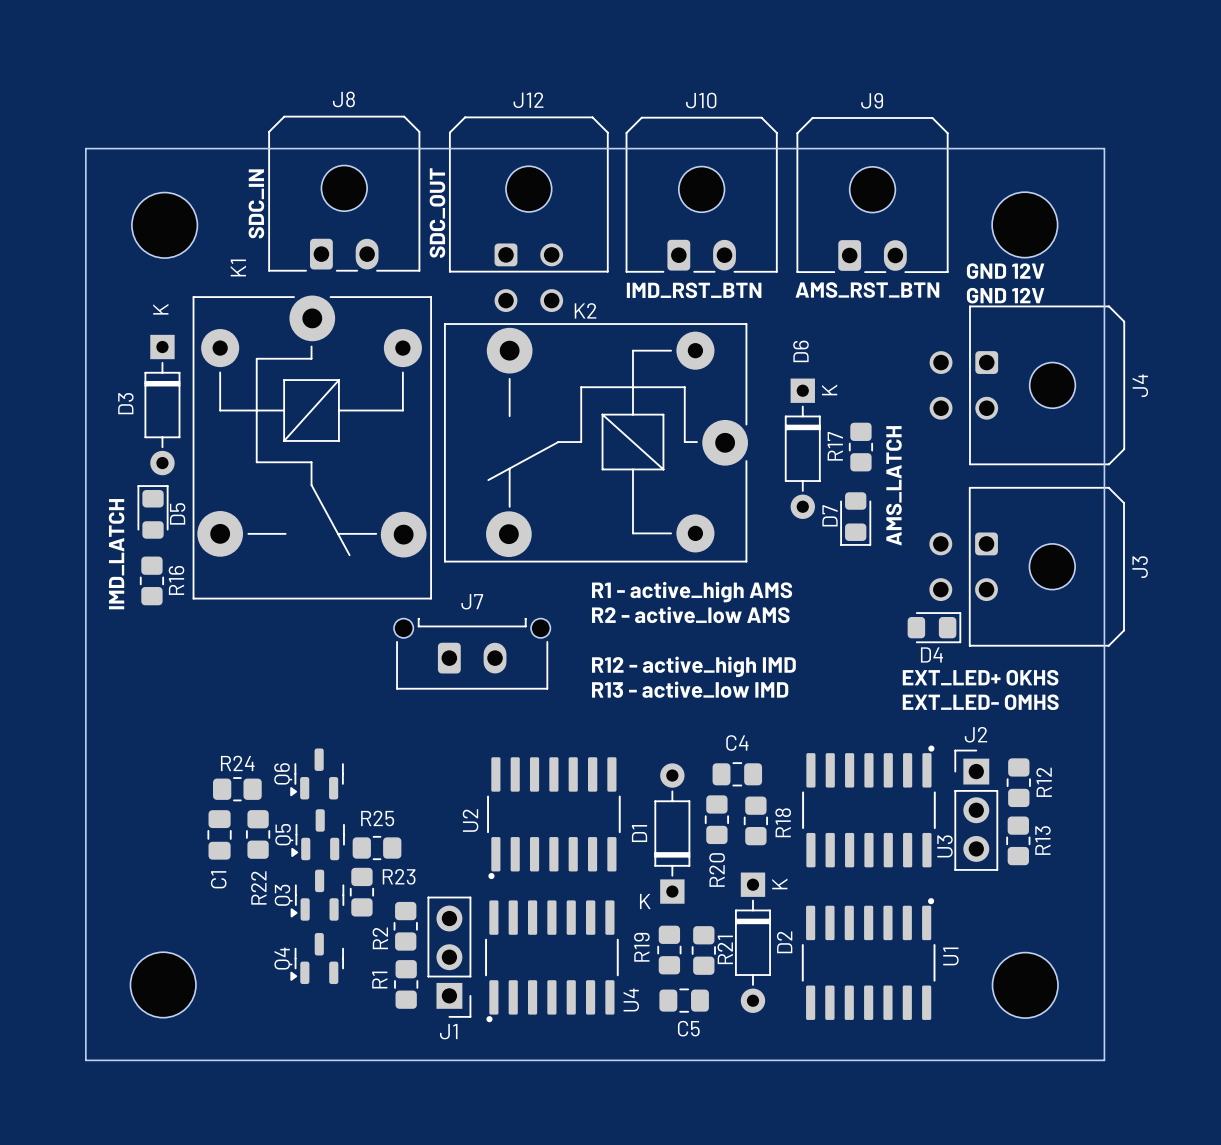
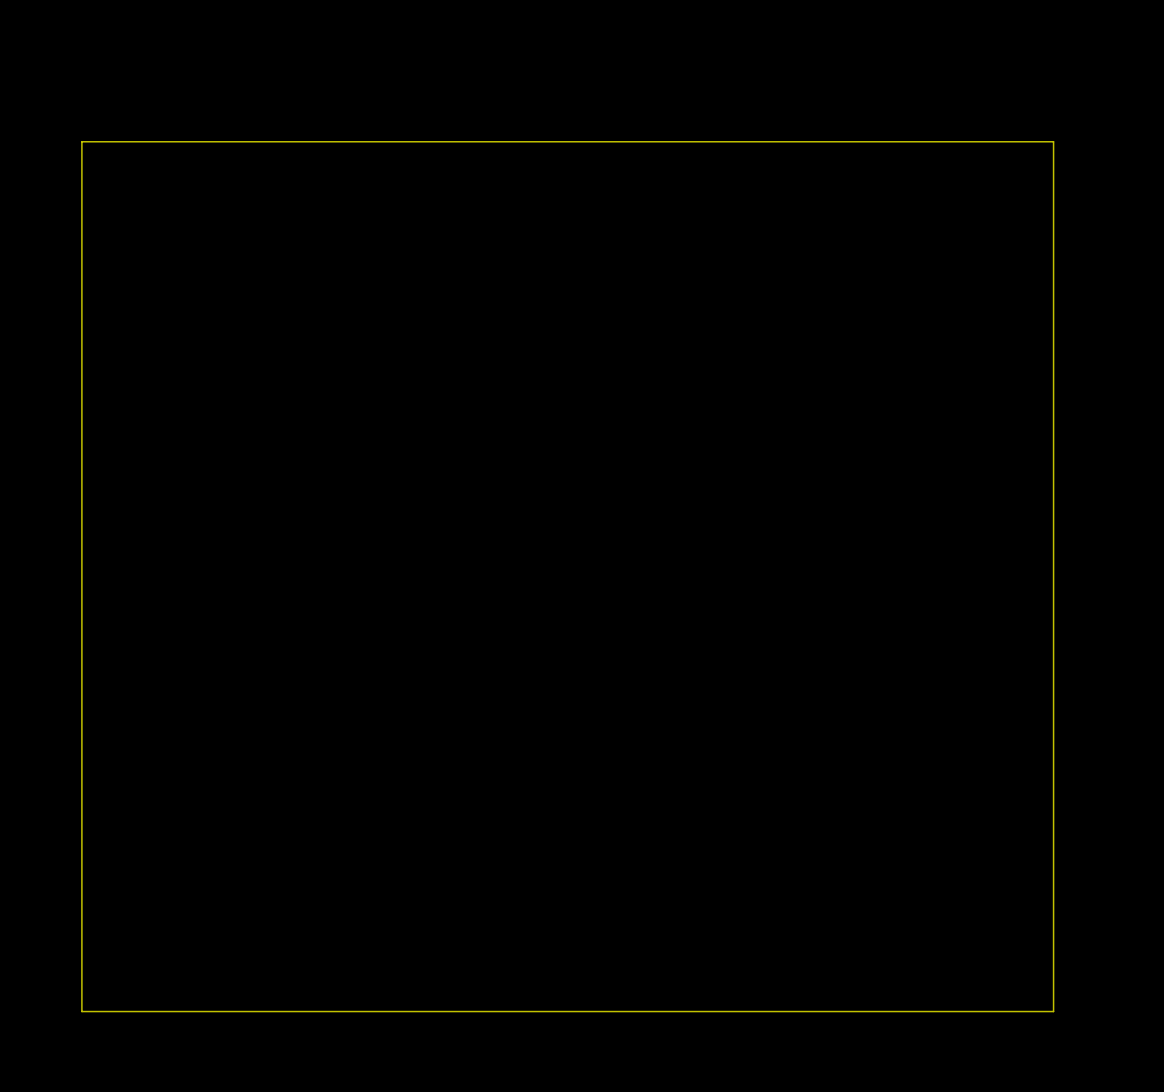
J8: (344, 193) -> none
J10: (701, 194) -> none
J9: (872, 195) -> none
text: SDC_IN (256, 203) -> none
text: SDC_OUT (437, 213) -> none
J12: (528, 214) -> none
part: (1024, 224) -> none
part: (164, 225) -> none
text: GND 12V (1005, 271) -> none
text: IMD_RST_BTN (694, 290) -> none
text: AMS_RST_BTN (867, 290) -> none
text: GND 12V (1005, 295) -> none
J4: (1027, 385) -> none
D3: (162, 405) -> none
K2: (595, 442) -> none
K1: (312, 447) -> none
R17: (860, 447) -> none
D6: (802, 448) -> none
text: AMS_LATCH (893, 485) -> none
D5: (153, 511) -> none
D7: (855, 519) -> none
text: IMD_LATCH (116, 554) -> none
J3: (1027, 566) -> none
R16: (151, 580) -> none
text: R1 - active_high AMS (692, 592) -> none
text: R2 - active_low AMS (690, 614) -> none
D4: (934, 627) -> none
J7: (472, 653) -> none
text: R12 - active_high IMD (693, 666) -> none
text: EXT_LED+ OKHS (980, 677) -> none
text: R13 - active_low IMD (690, 689) -> none
text: EXT_LED- OMHS (980, 702) -> none
Q6: (317, 773) -> none
C4: (737, 774) -> none
R12: (1018, 782) -> none
R24: (237, 789) -> none
U3: (868, 806) -> none
J2: (976, 810) -> none
U2: (553, 818) -> none
R20: (716, 819) -> none
R18: (755, 820) -> none
D1: (672, 833) -> none
C1: (219, 834) -> none
R22: (258, 834) -> none
Q5: (318, 834) -> none
R13: (1018, 840) -> none
R25: (377, 848) -> none
R23: (361, 892) -> none
Q3: (317, 895) -> none
R2: (405, 926) -> none
D2: (752, 942) -> none
R19: (669, 950) -> none
R21: (703, 950) -> none
J1: (449, 957) -> none
Q4: (317, 958) -> none
U1: (868, 959) -> none
U4: (551, 961) -> none
part: (163, 984) -> none
R1: (406, 984) -> none
part: (1025, 985) -> none
C5: (684, 1000) -> none

